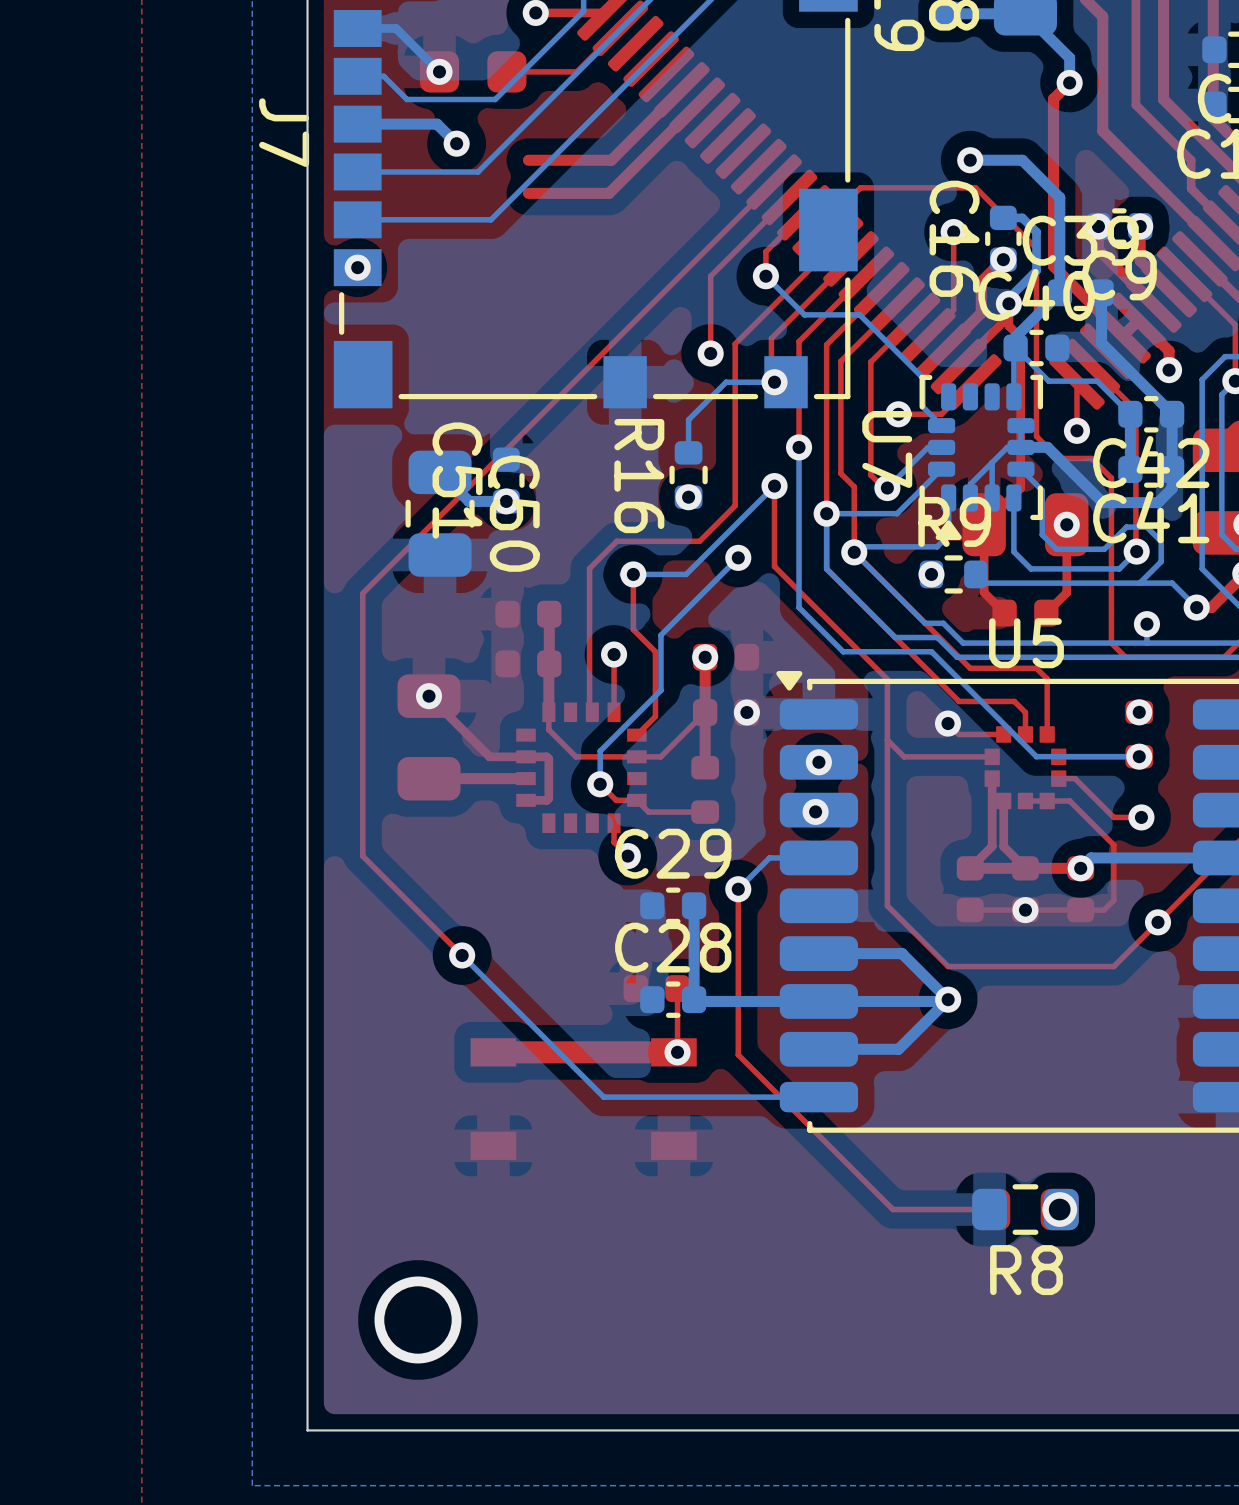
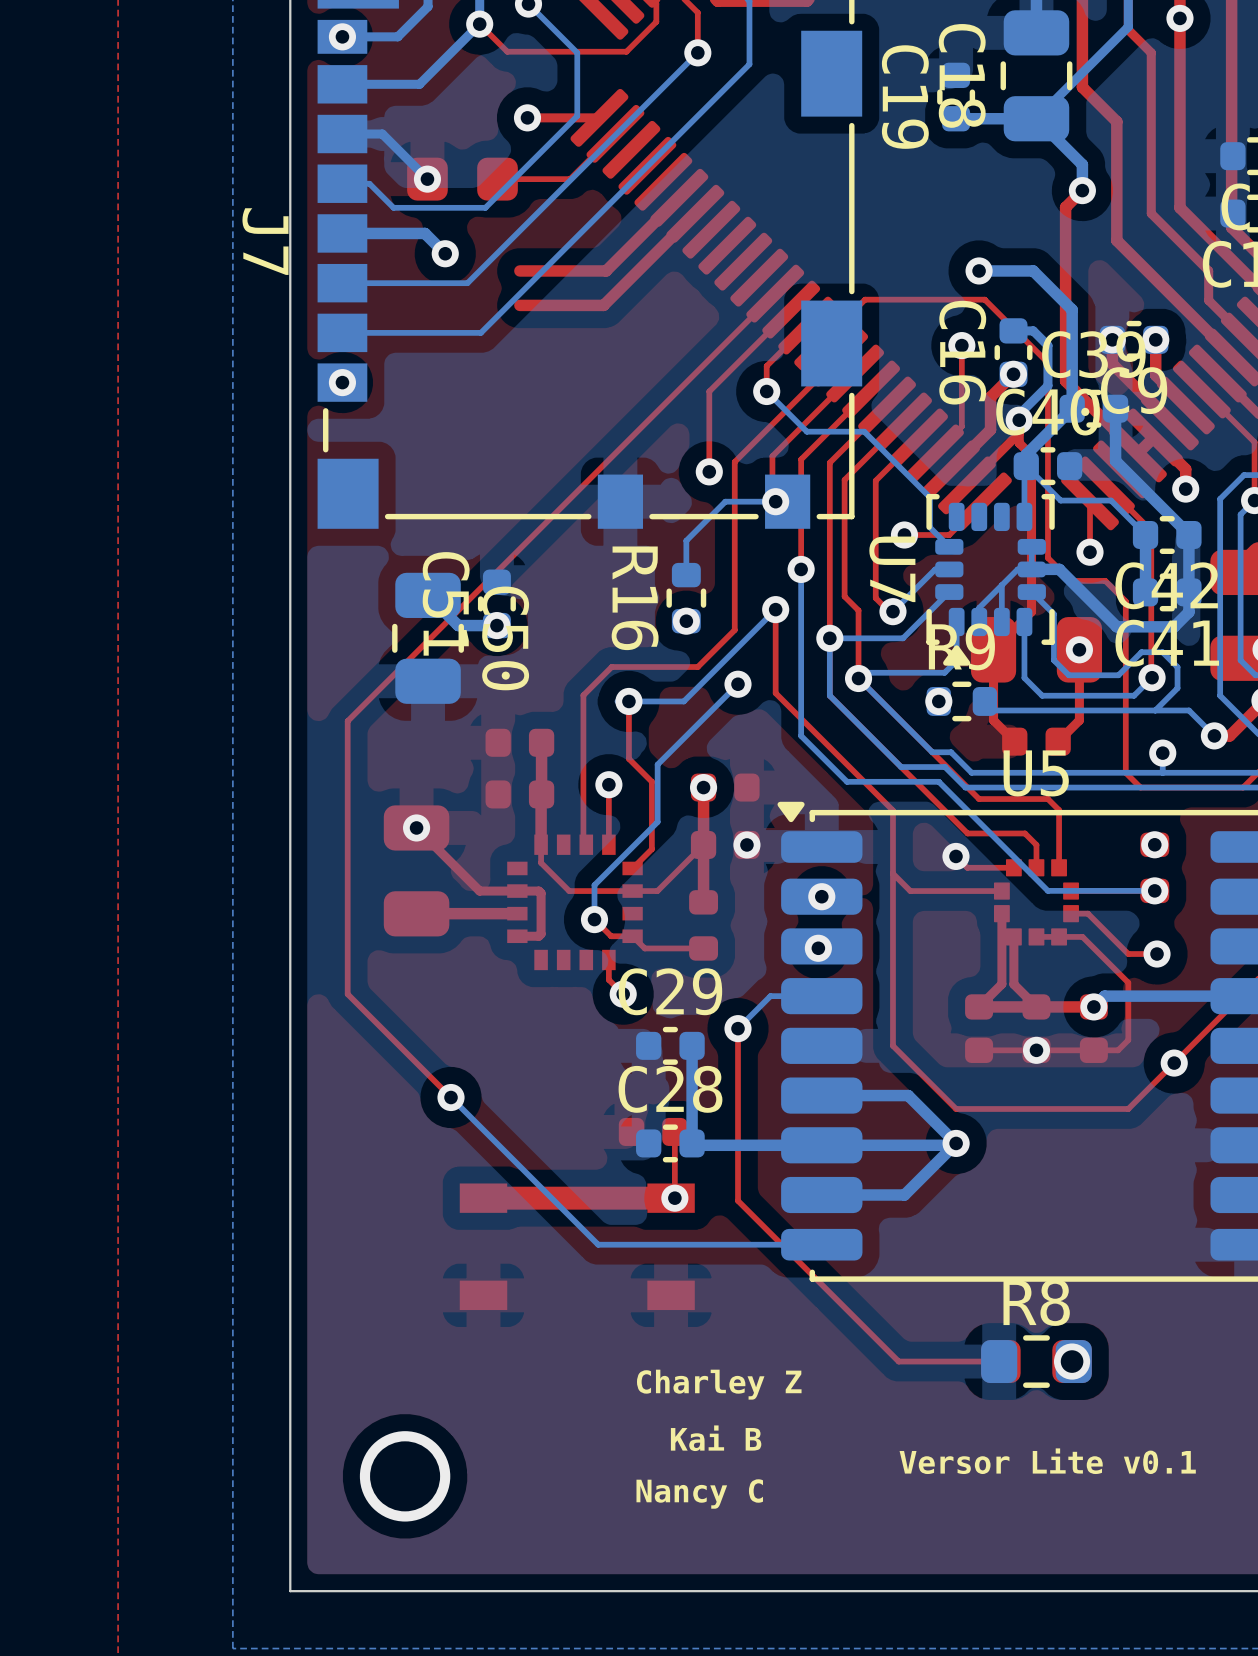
text: none -> Charley Z (719, 1384)
R8 name position: R8 (1026, 1270) -> R8 (1036, 1302)
text: none -> Kai B (716, 1438)
text: none -> Versor Lite v0.1 (1047, 1461)
text: none -> Nancy C (699, 1493)

